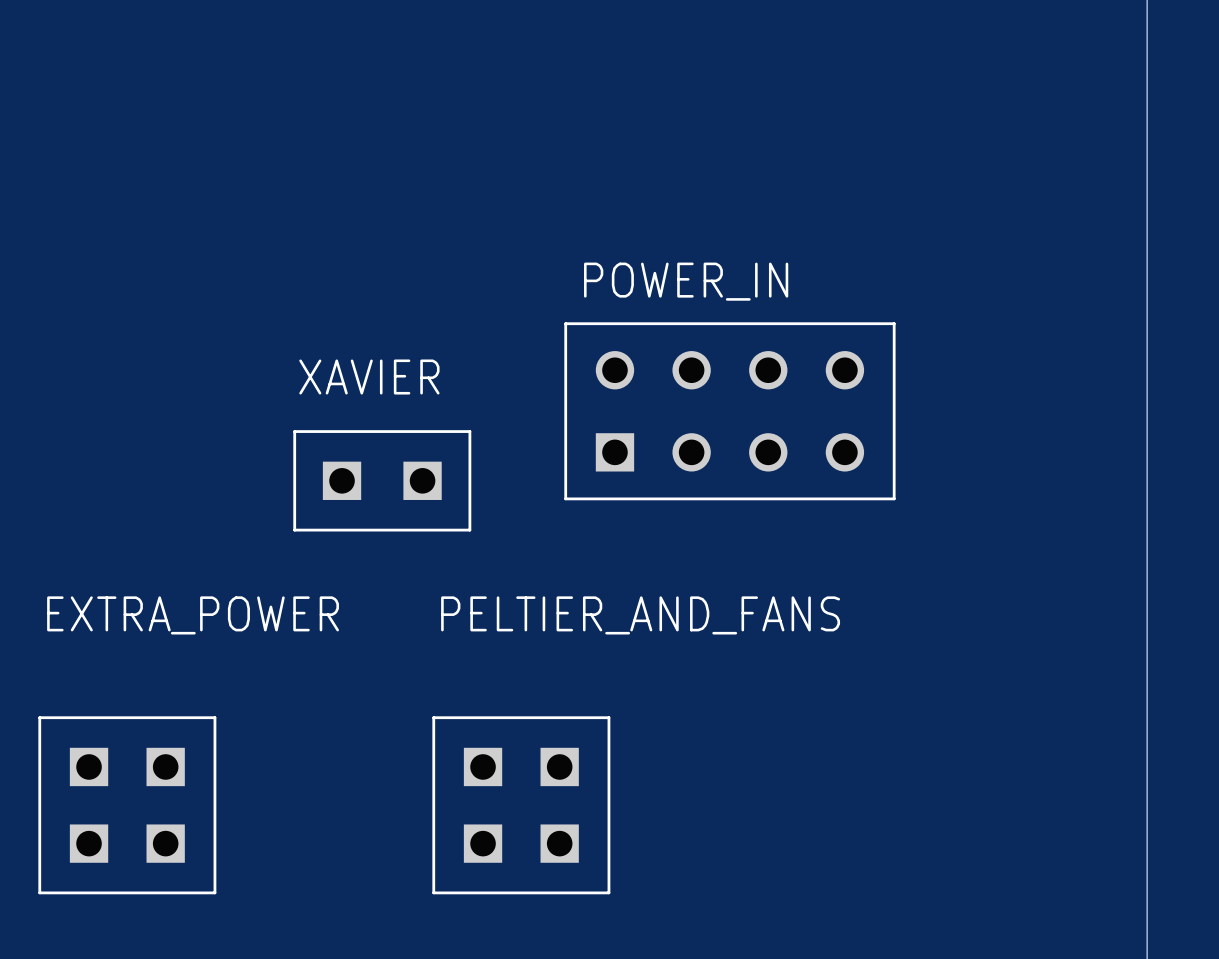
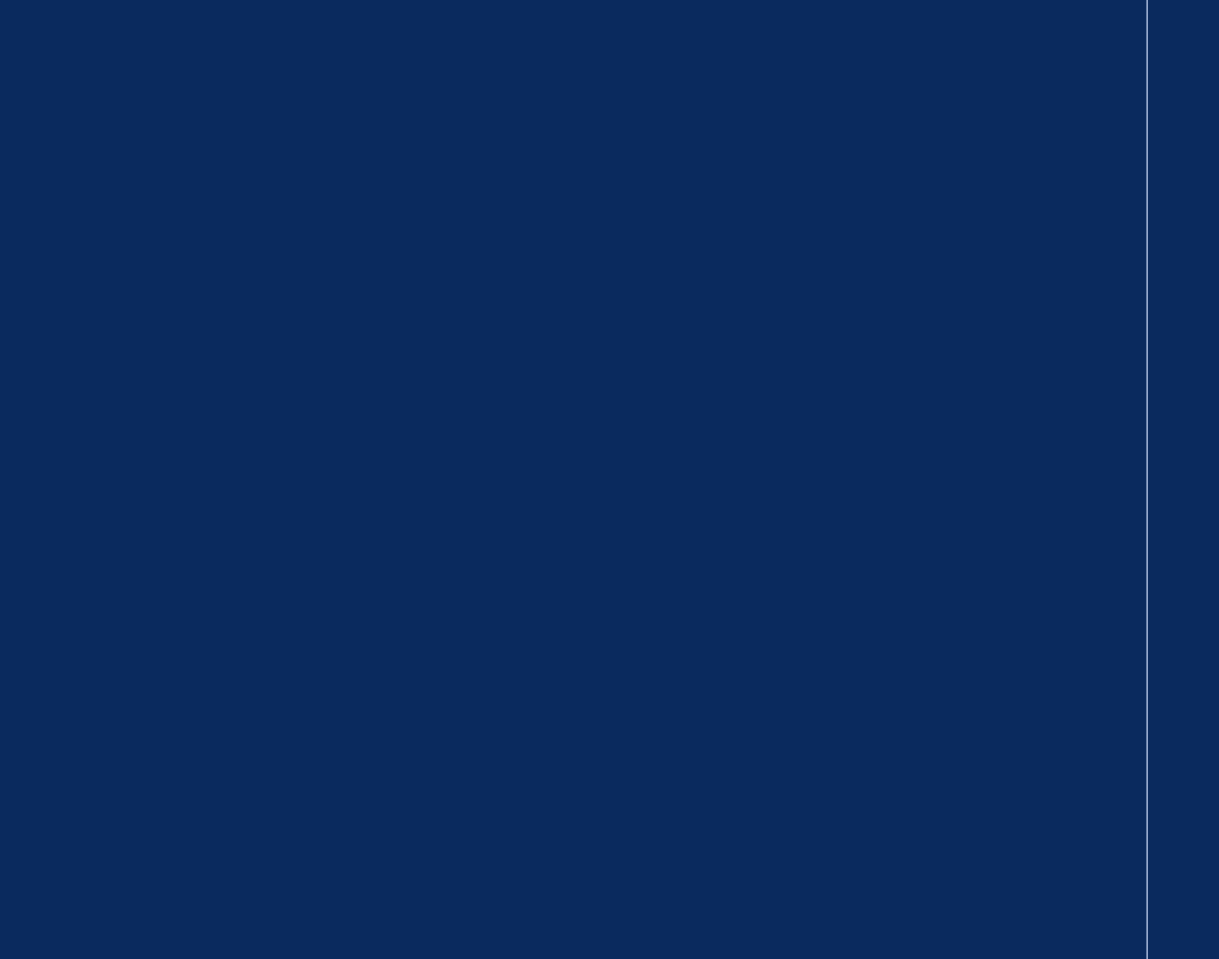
POWER_IN: (729, 411) -> none
XAVIER: (382, 480) -> none
EXTRA_POWER: (127, 805) -> none
PELTIER_AND_FANS: (521, 805) -> none

